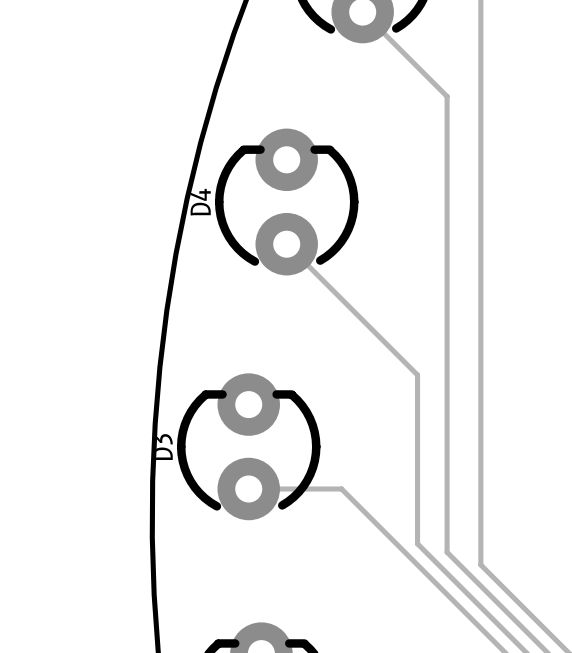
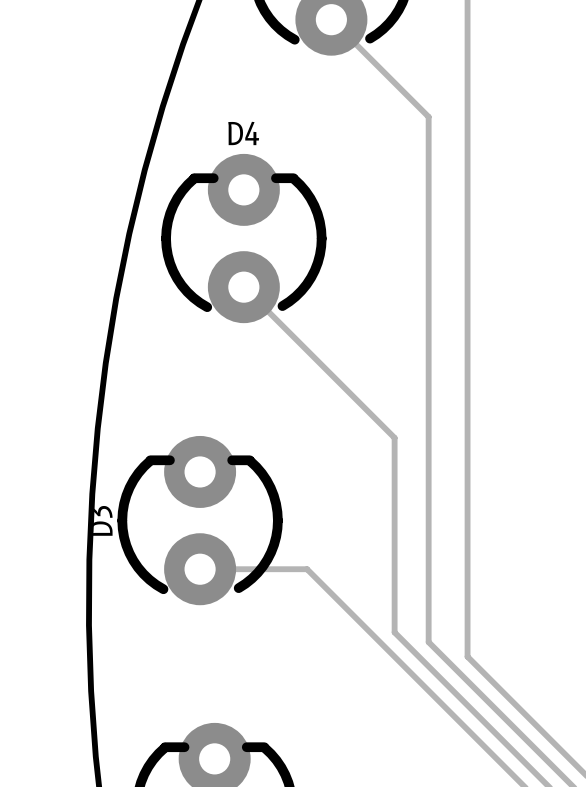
D4 name rotation: 0° (200, 202) -> 90° clockwise (243, 133)
D4 name position: D4 (200, 202) -> D4 (243, 133)

